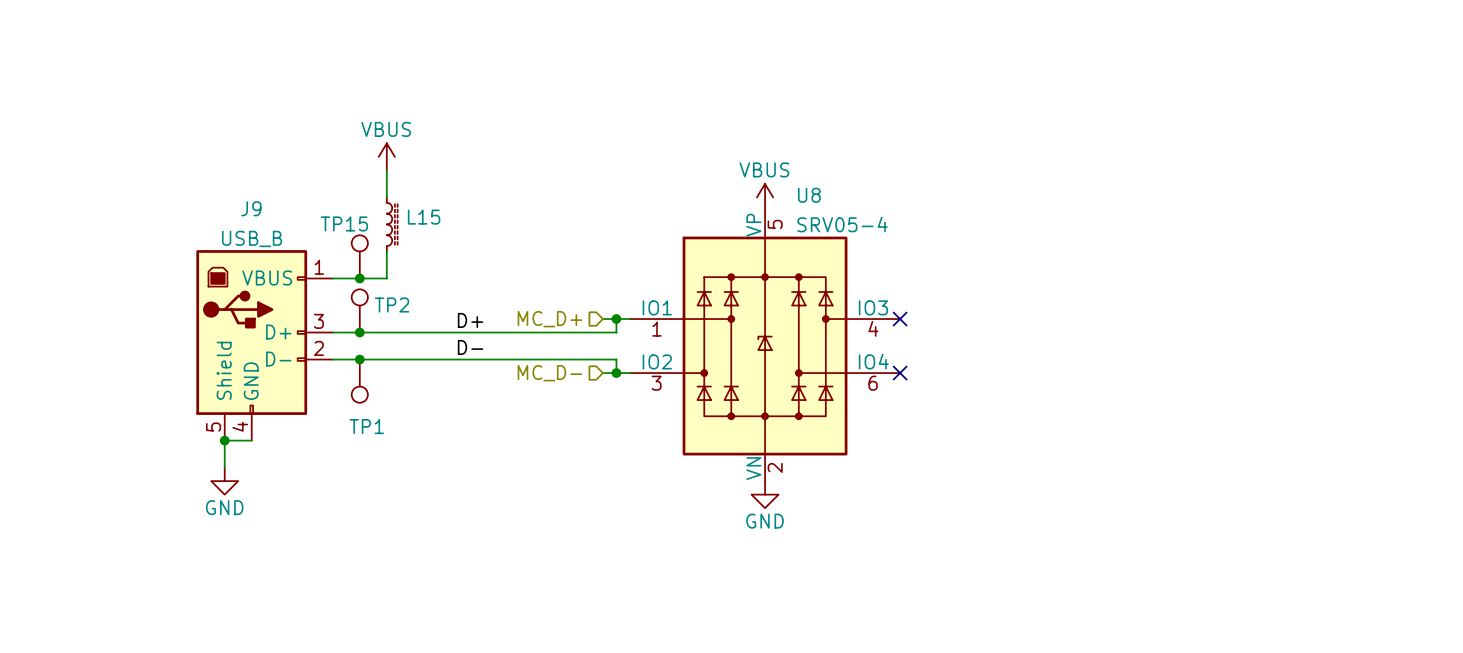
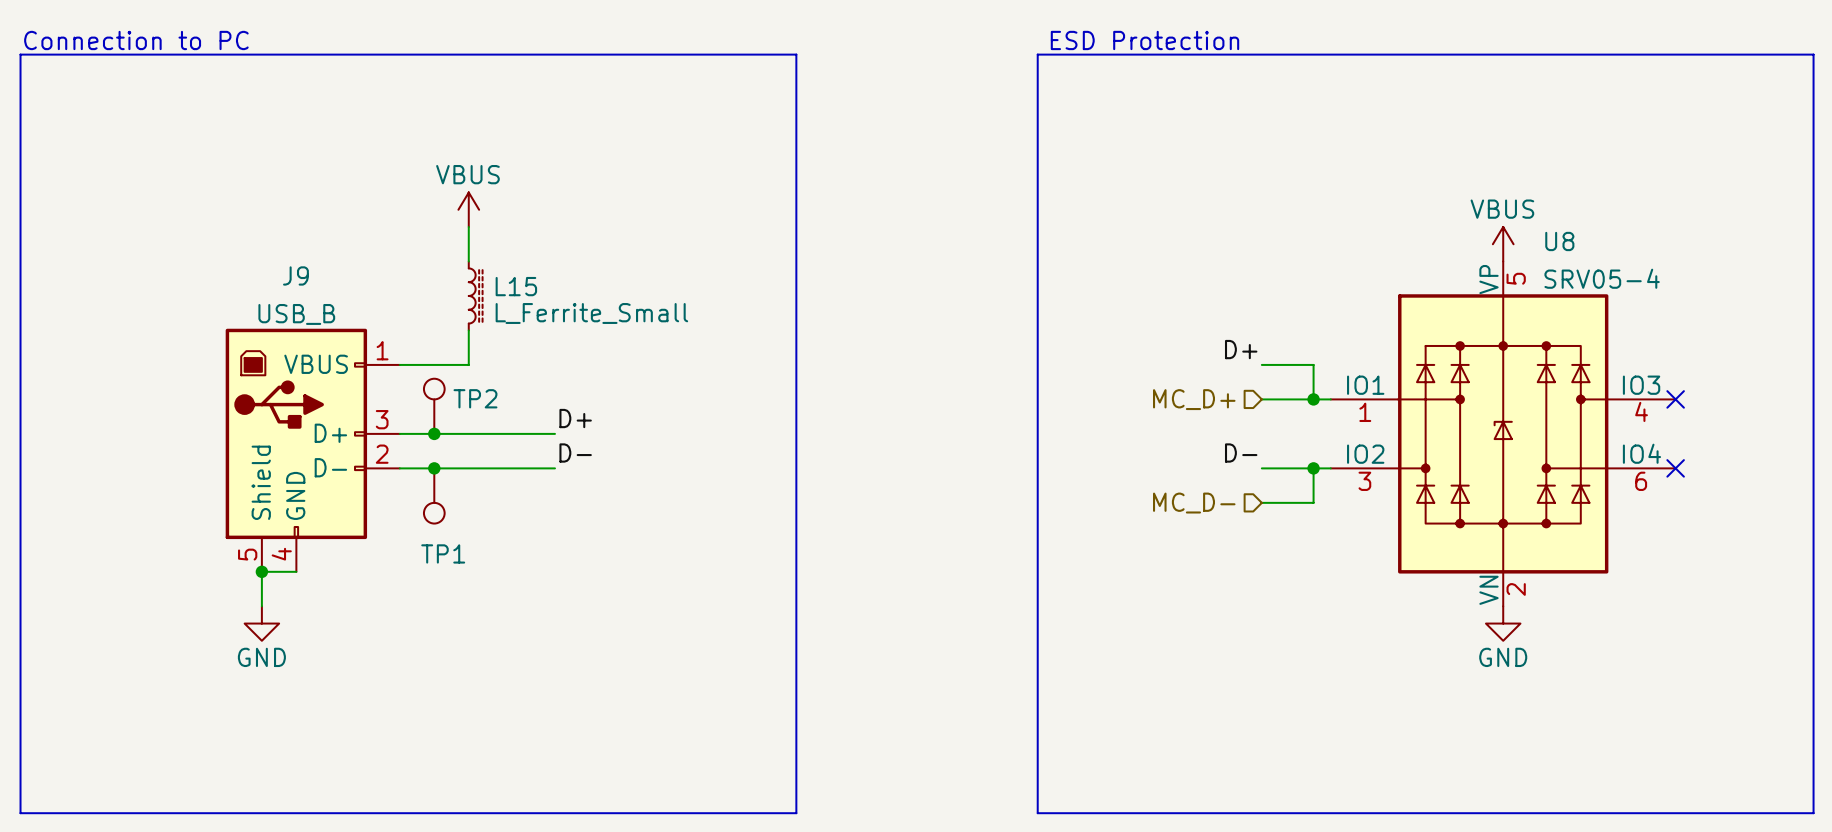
text: none -> Connection to PC (136, 40)
text: none -> ESD Protection (1144, 40)
line: none -> (20, 54) (20, 813) (796, 813) (796, 54) (20, 54)
line: none -> (1037, 54) (1037, 813) (1813, 813) (1813, 54) (1037, 54)
power symbol: none -> VBUS (1503, 244)
power symbol: VBUS (765, 197) -> none
L15 value: none -> L_Ferrite_Small (591, 313)
TP15: (359, 256) -> none
label: none -> D+ (1241, 349)
junction: (359, 278) -> none
wire: none -> (1261, 364) (1313, 364) (1313, 399)
hierarchical label: none -> MC_D+ (1194, 399)
wire: none -> (1261, 399) (1330, 399)
junction: none -> (1313, 399)
no-connect mark: none -> (1675, 399)
hierarchical label: MC_D+ (549, 319) -> none
wire: (602, 319) (629, 319) -> none
wire: (616, 319) (616, 332) (454, 332) -> none
junction: (616, 319) -> none
no-connect mark: (900, 319) -> none
U8 position: (765, 346) -> (1503, 433)
label: none -> D- (1241, 453)
wire: (454, 359) (616, 359) (616, 373) -> none
wire: none -> (1261, 468) (1330, 468)
wire: none -> (1313, 468) (1313, 502) (1261, 502)
junction: none -> (1313, 468)
no-connect mark: none -> (1675, 468)
hierarchical label: MC_D- (549, 373) -> none
wire: (602, 373) (629, 373) -> none
junction: (616, 373) -> none
no-connect mark: (900, 373) -> none
hierarchical label: none -> MC_D- (1194, 503)
power symbol: none -> GND (1503, 623)
power symbol: GND (765, 494) -> none

